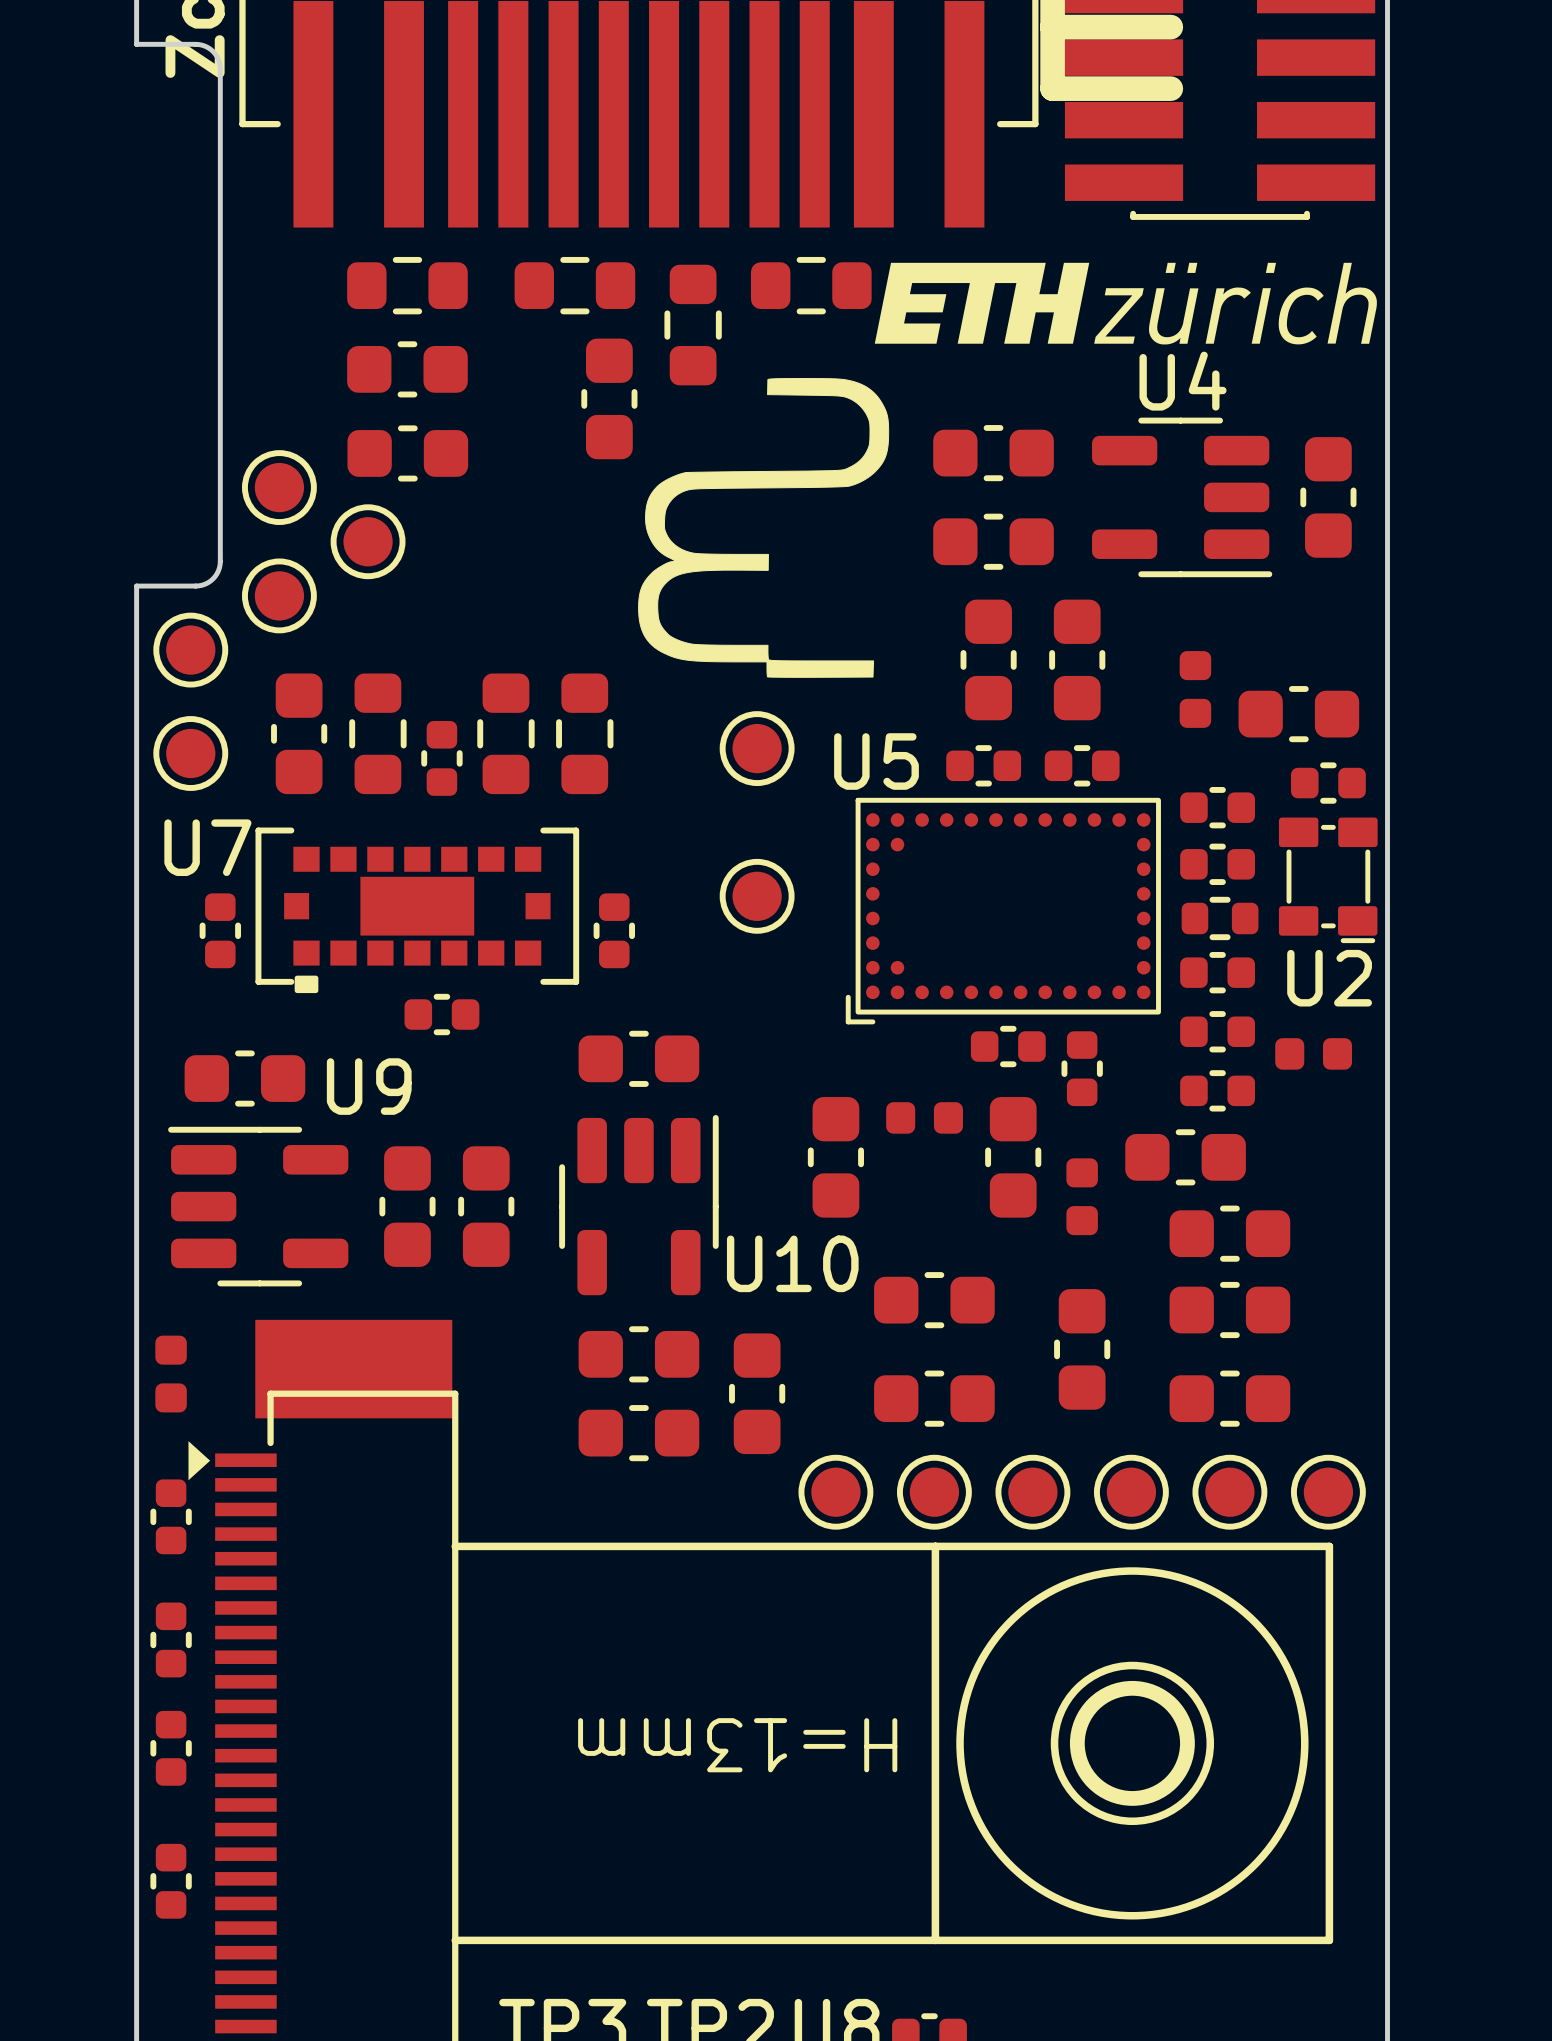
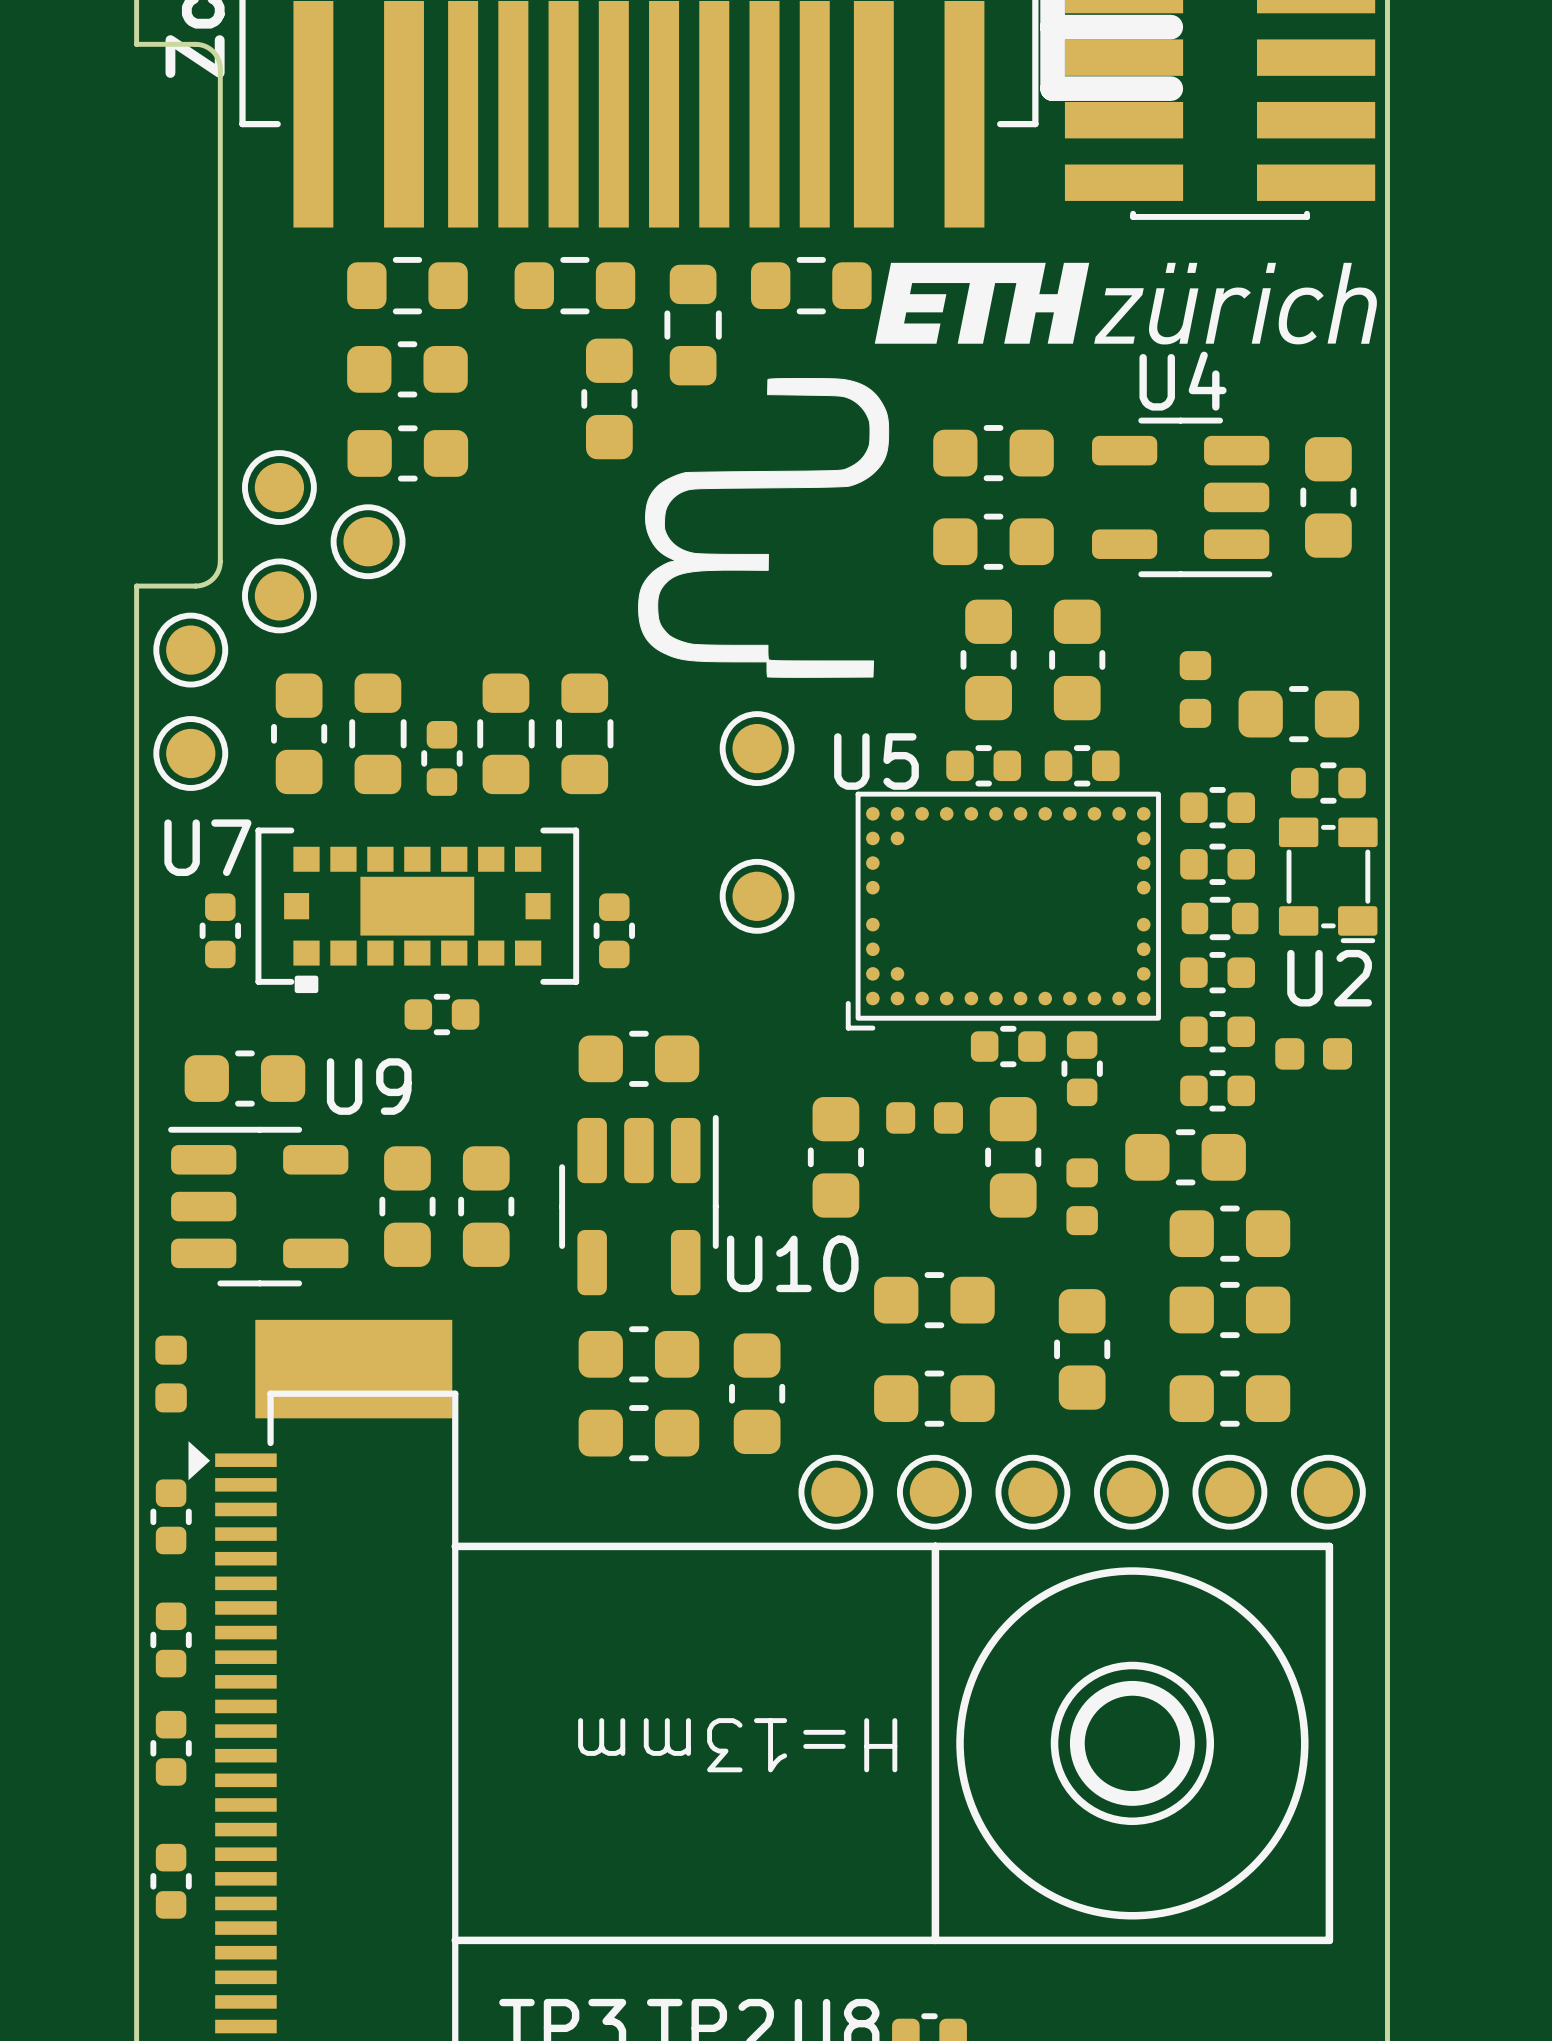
U5 footprint: [845, 797, 1161, 1025] -> [845, 791, 1161, 1031]

